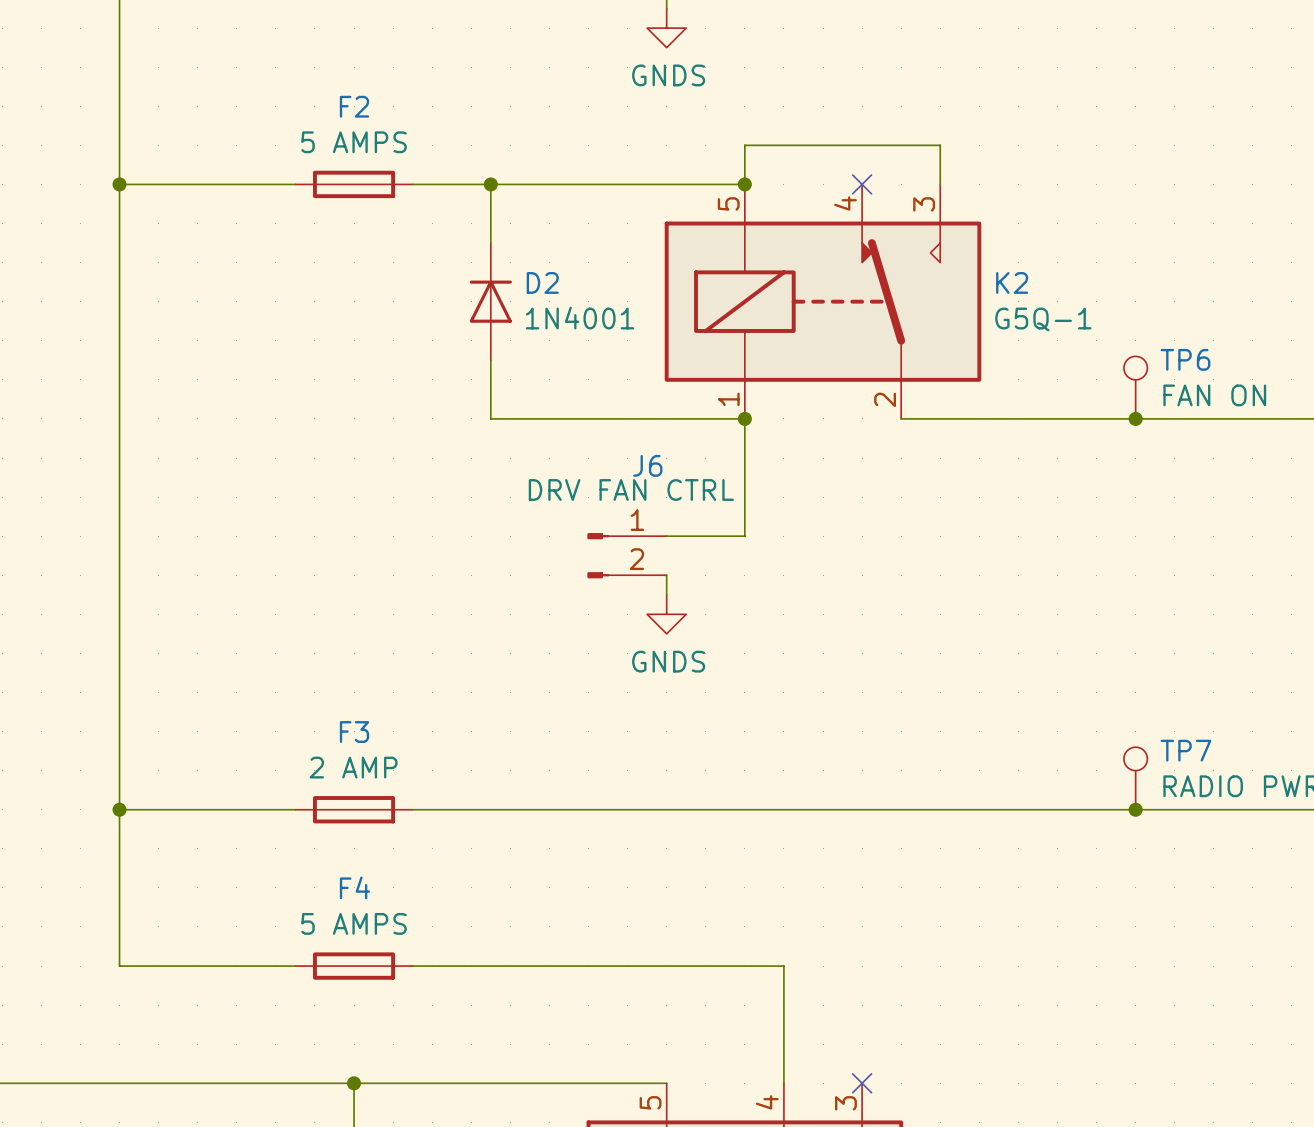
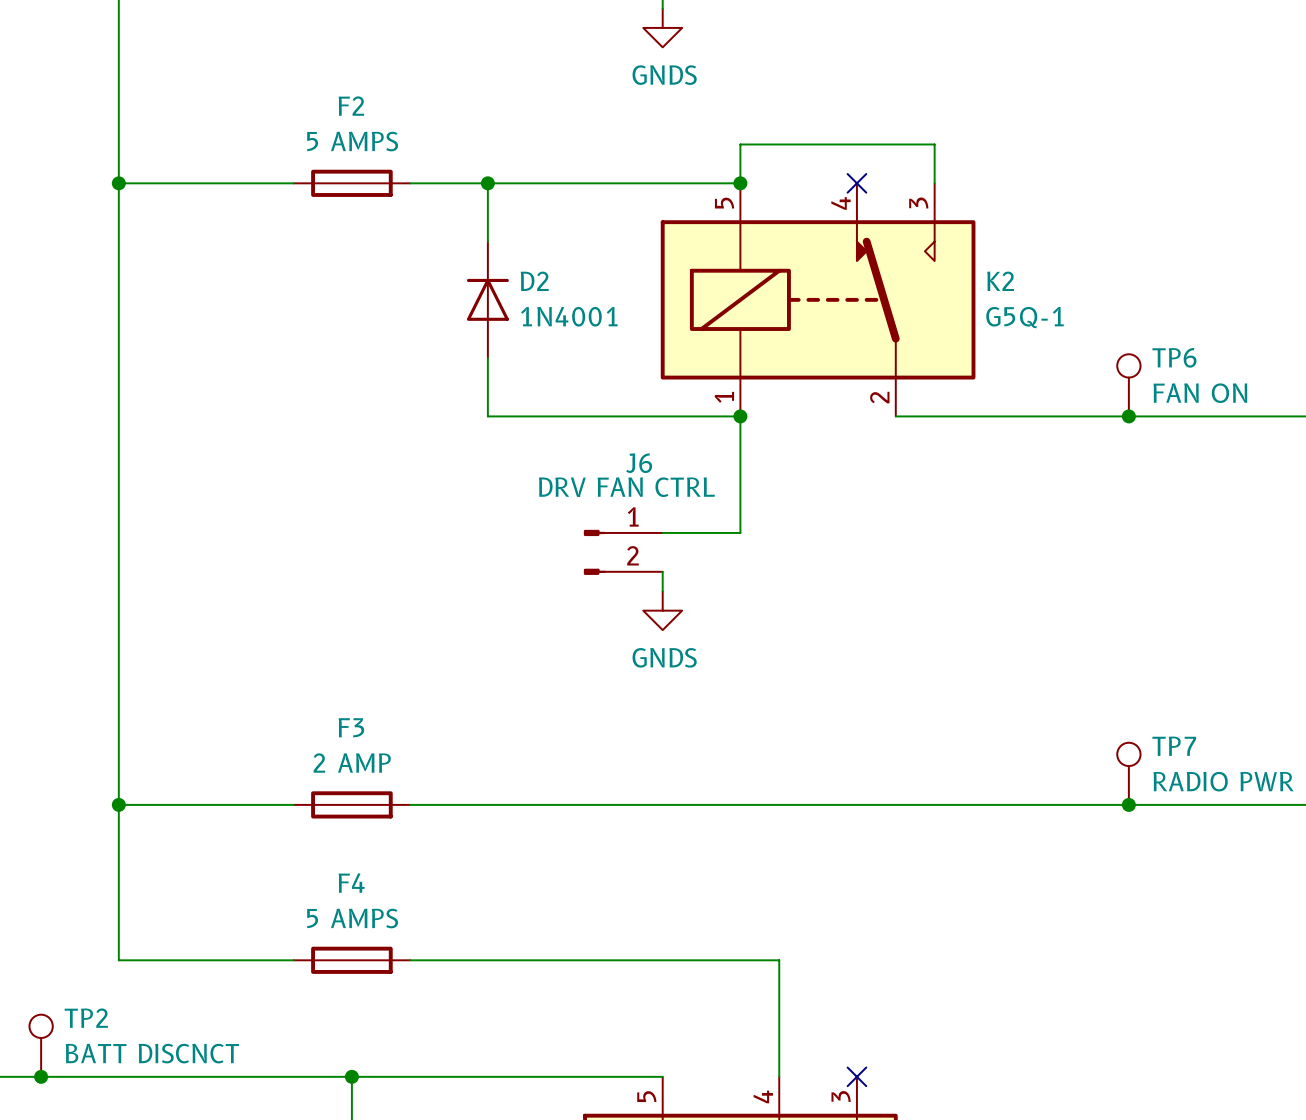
TP2: none -> BATT DISCNCT (41, 1045)
junction: none -> (41, 1076)

